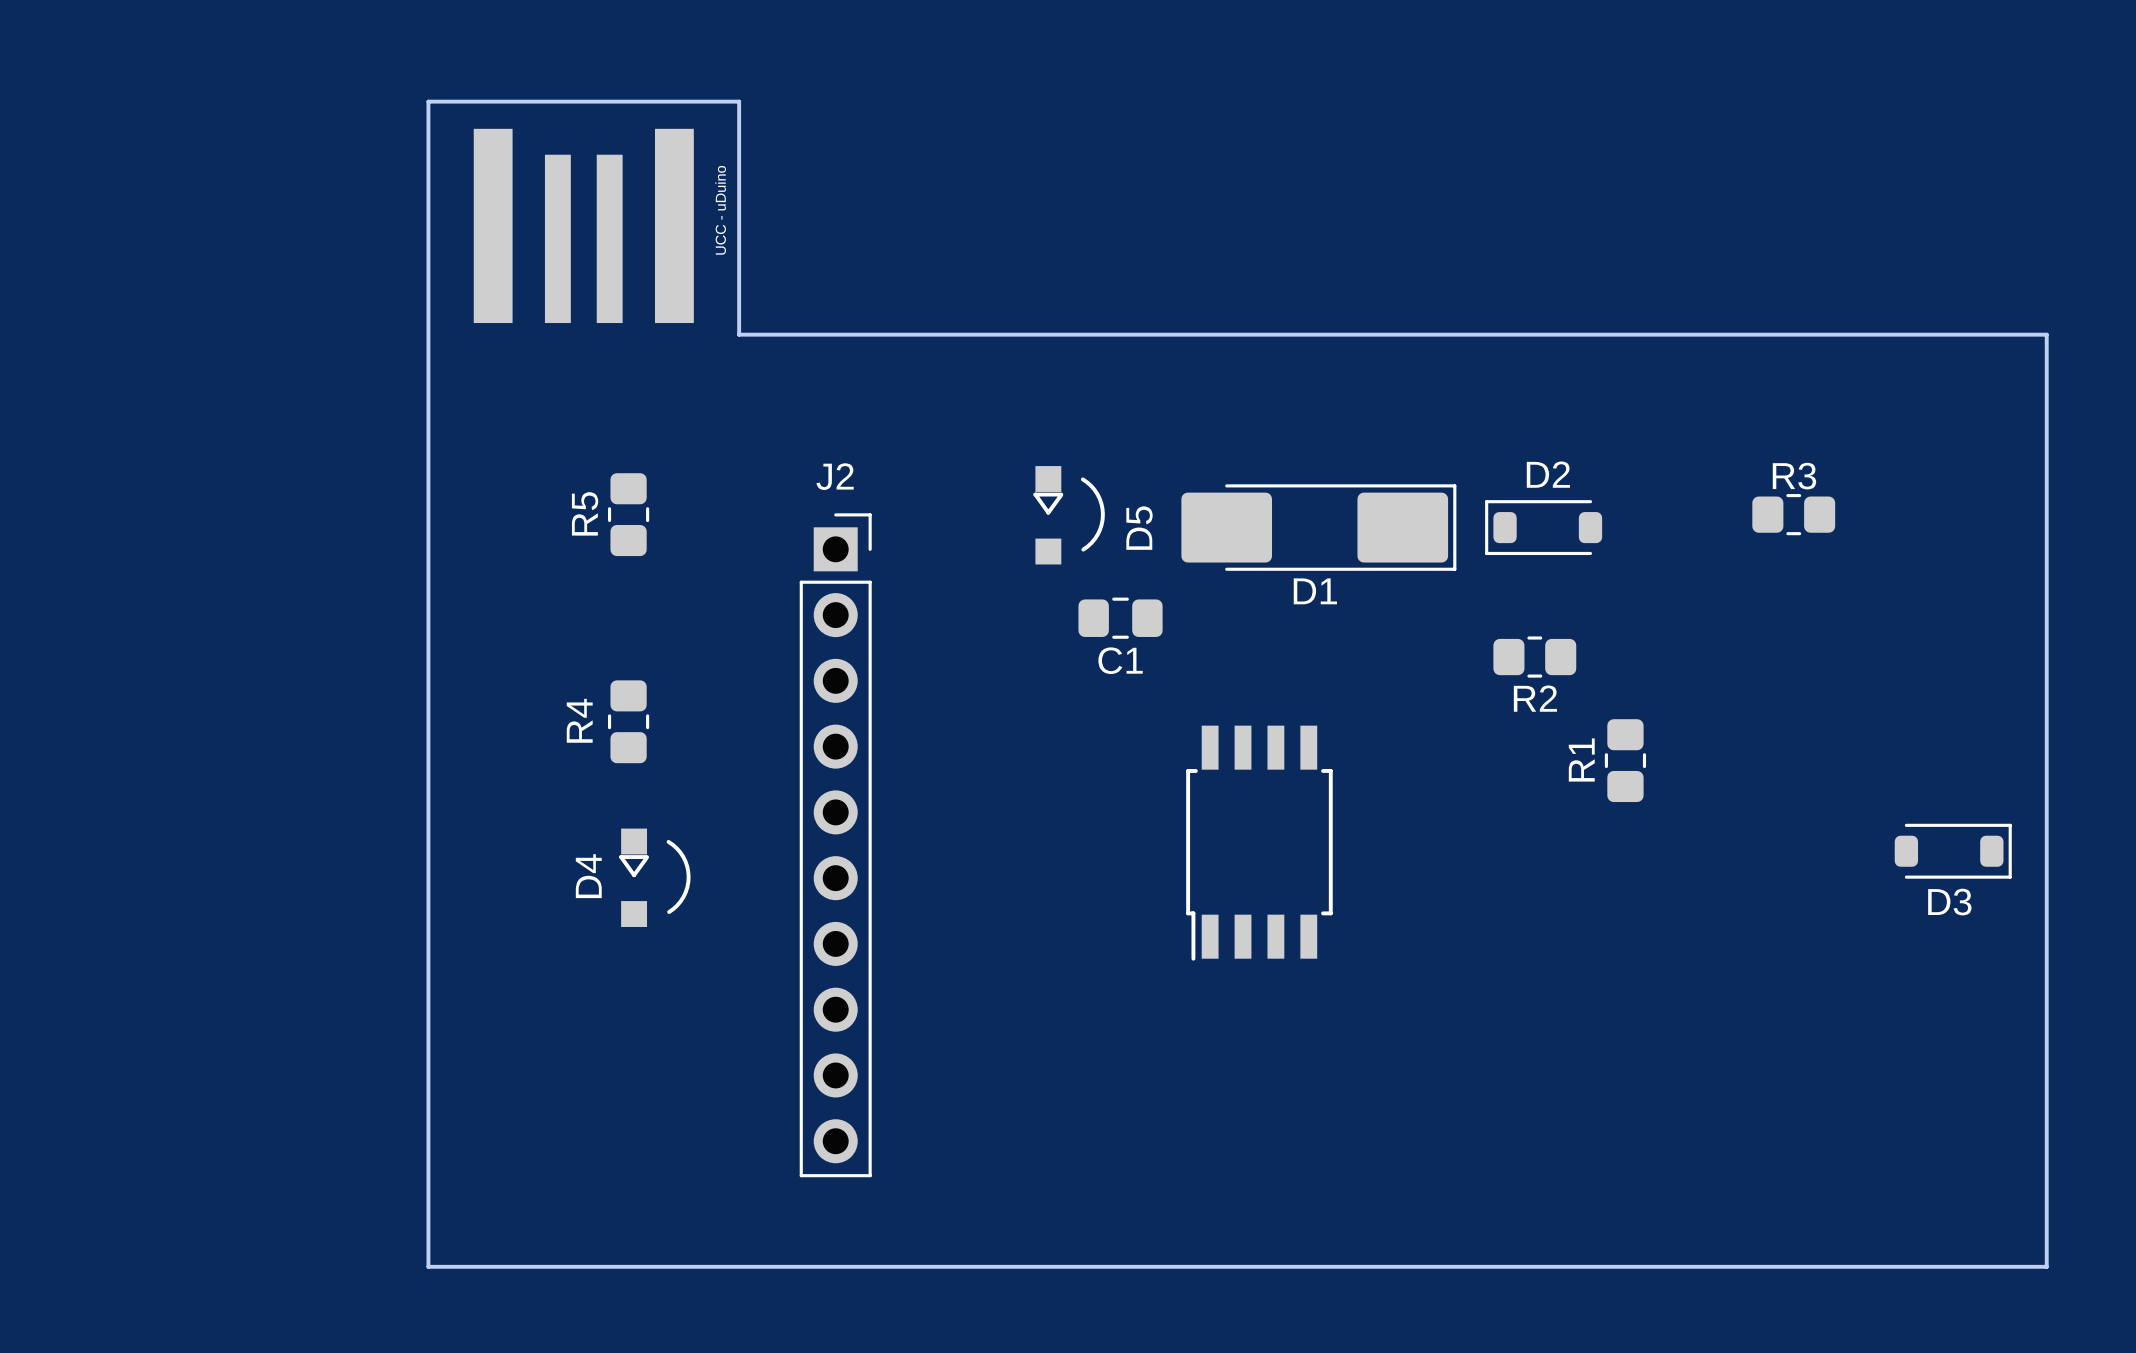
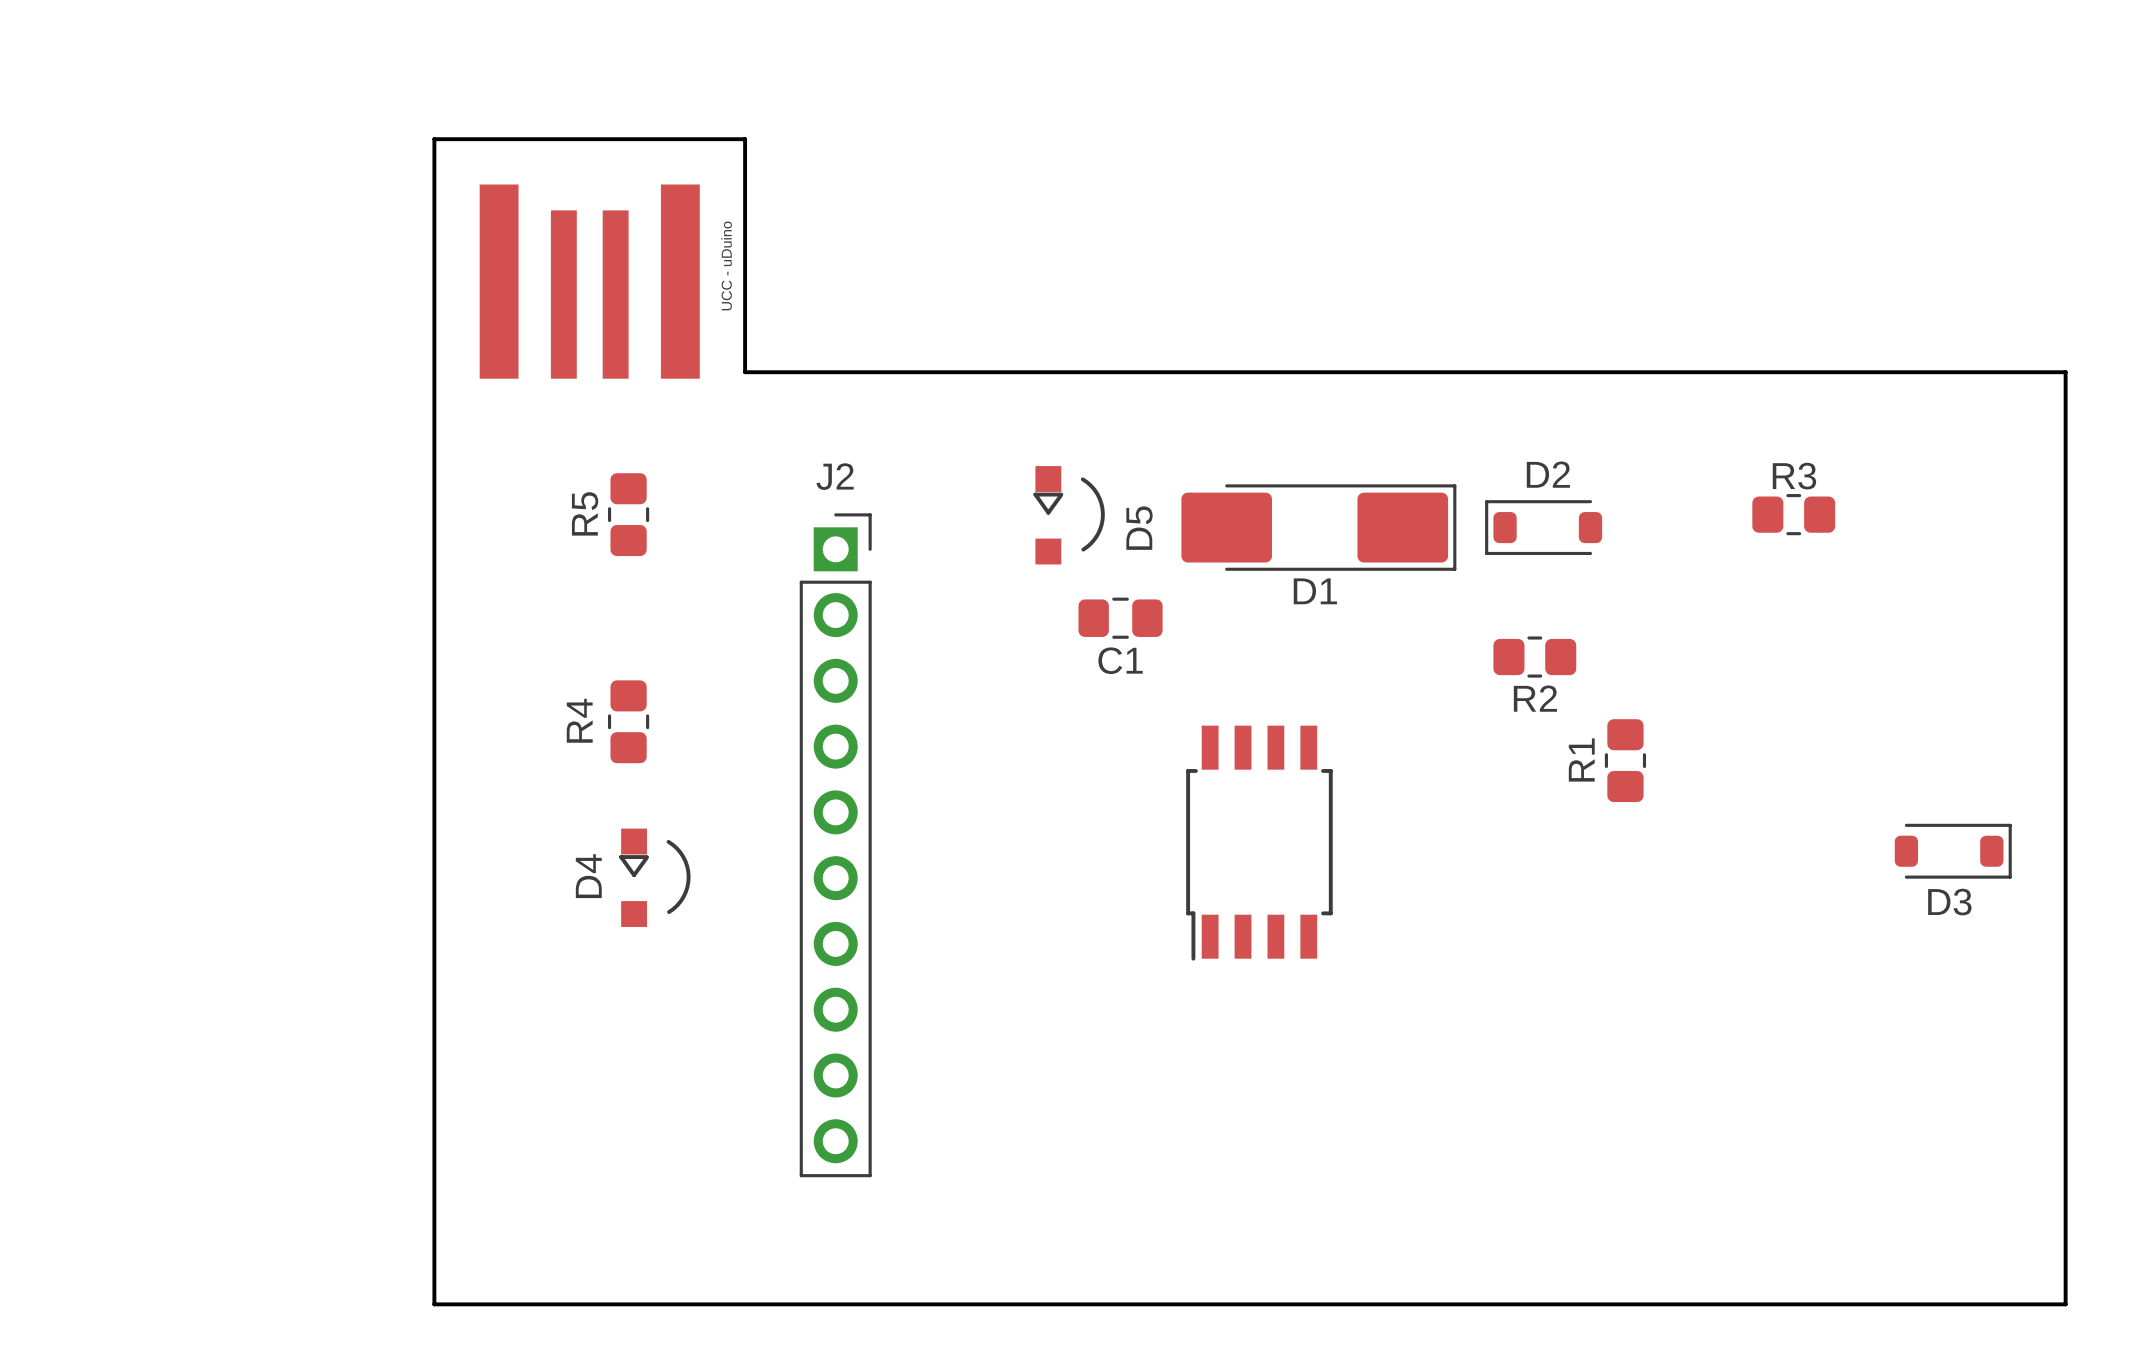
board edge: (428, 101) (739, 101) (739, 334) (2046, 334) (2046, 1266) (428, 1266) (428, 101) -> (434, 139) (434, 1304) (2065, 1304) (2065, 372) (745, 372) (745, 139) (434, 139)
part position: (583, 225) -> (589, 281)

